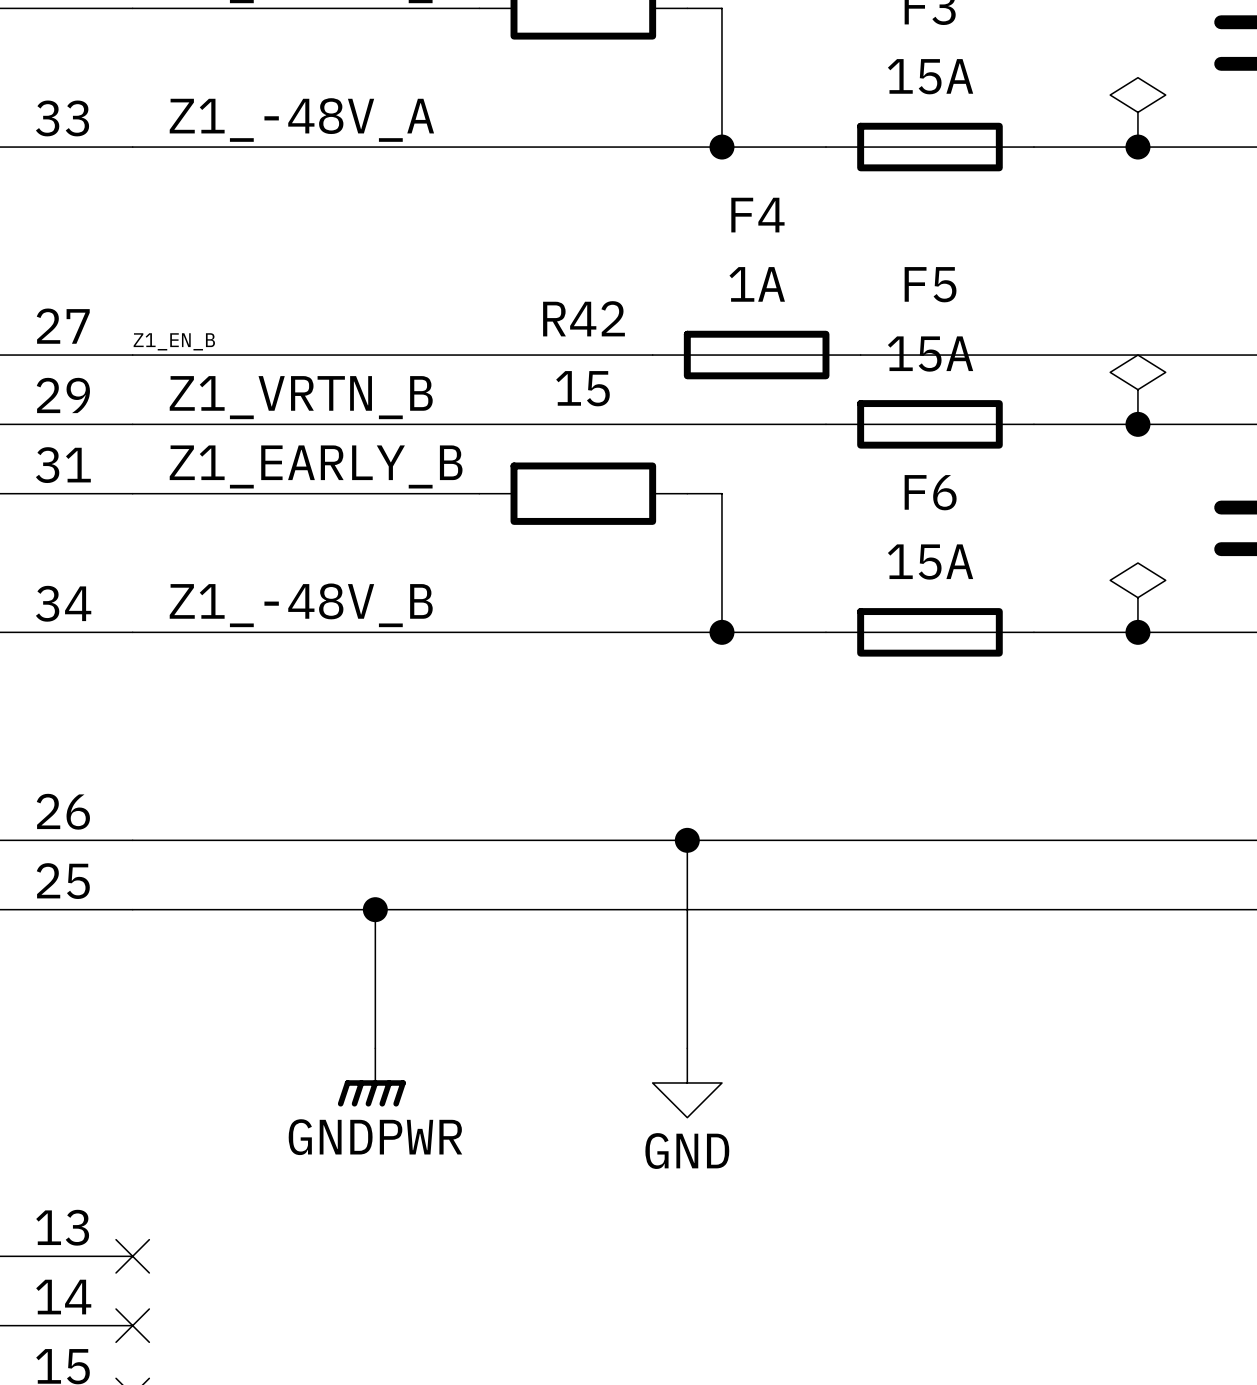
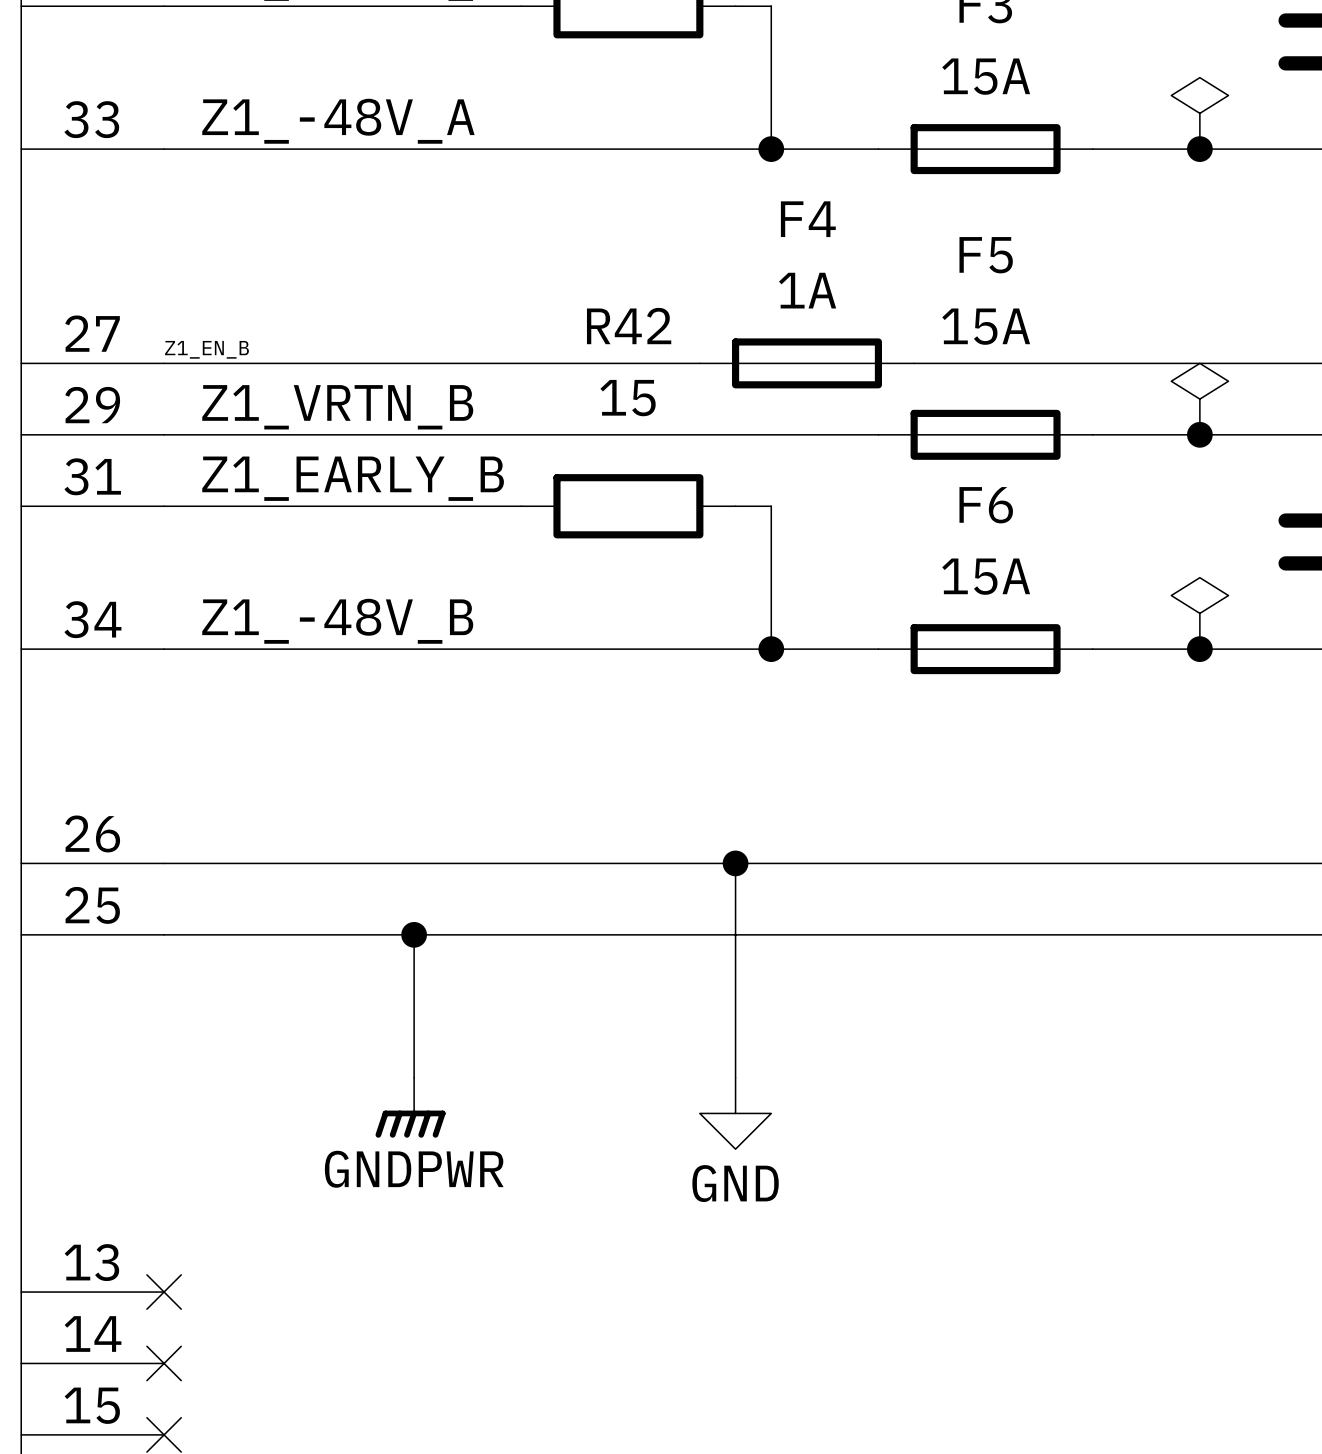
F5 name position: F5 (930, 284) -> F5 (986, 255)
F5 value position: 15A (930, 354) -> 15A (986, 326)

